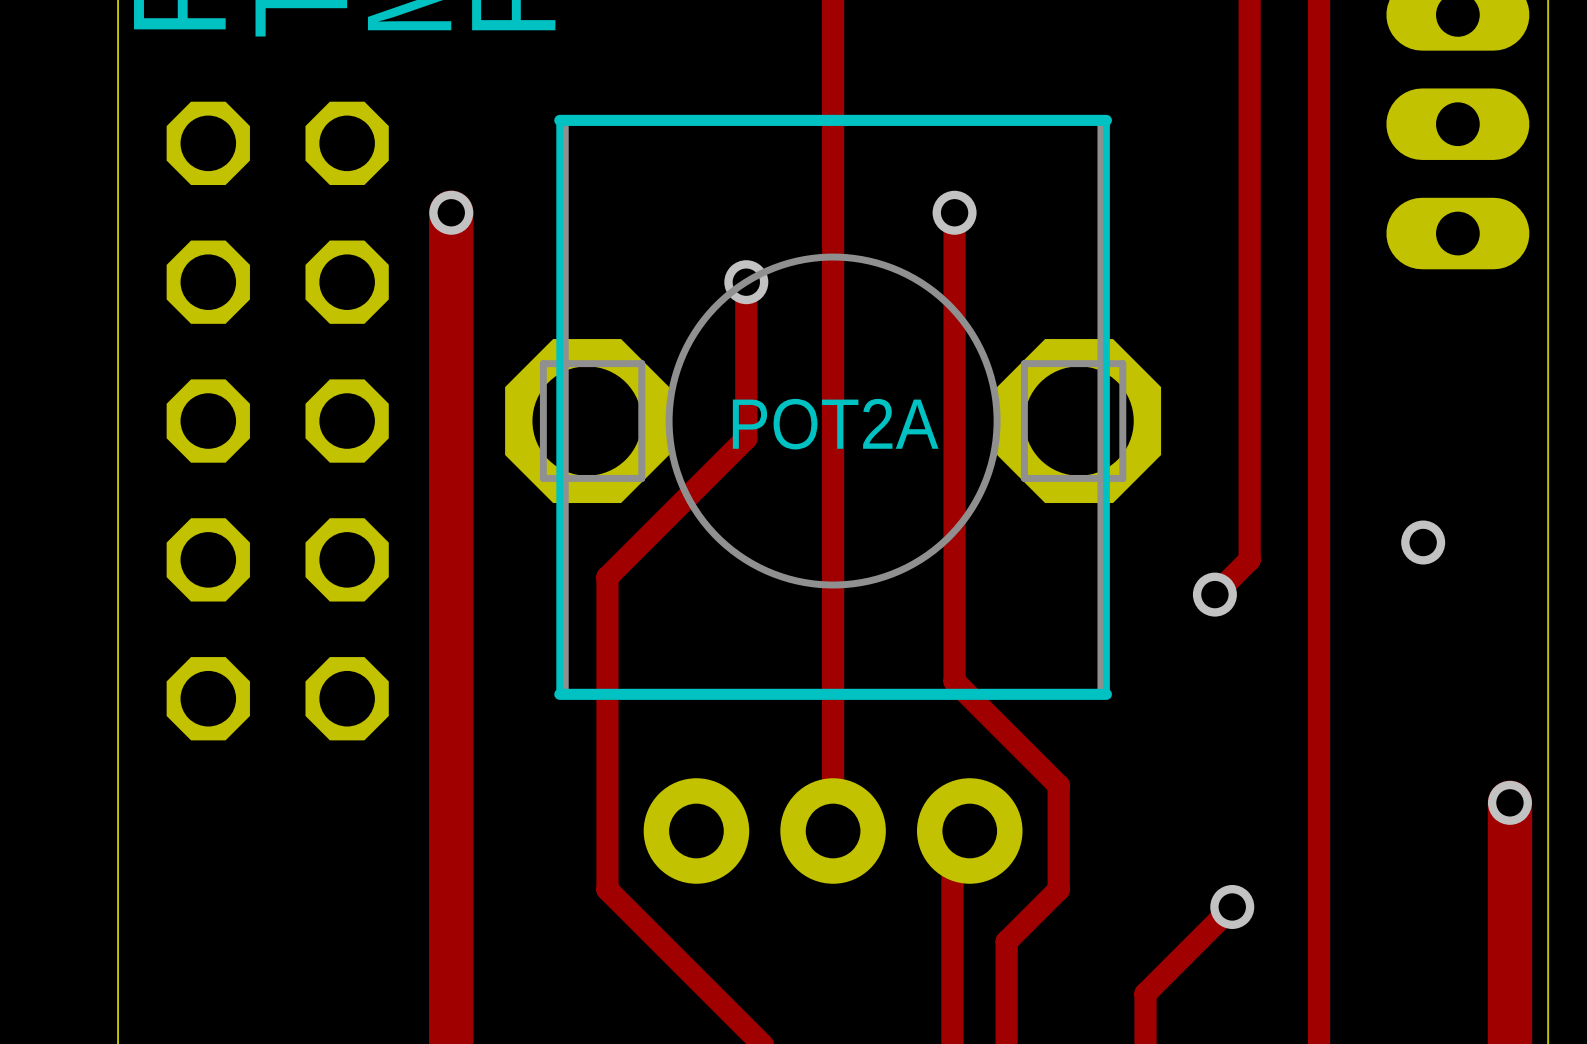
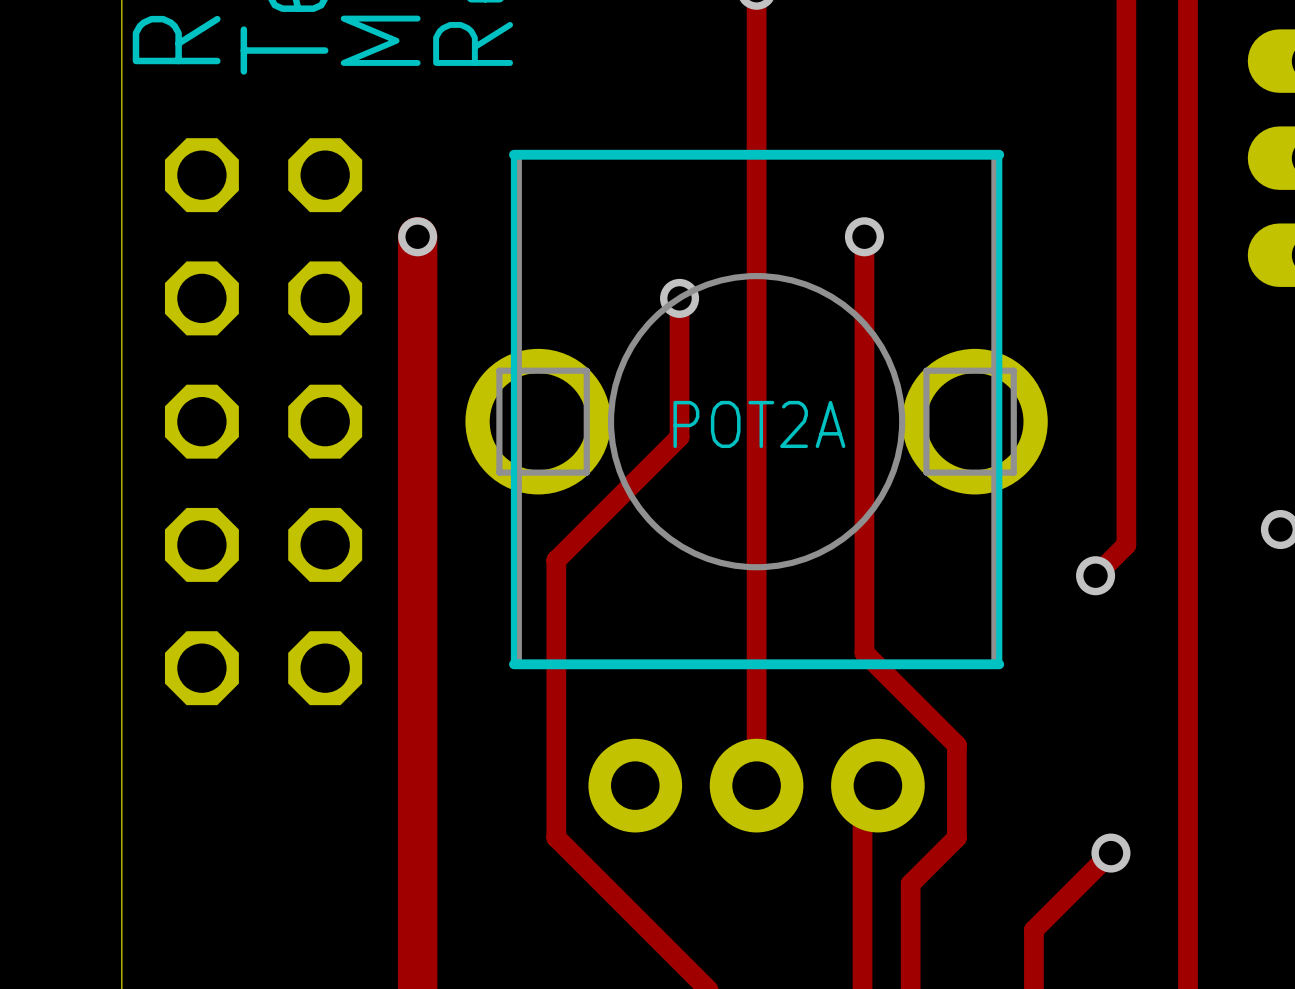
POT2A footprint: [505, 114, 1162, 884] -> [465, 149, 1048, 833]

